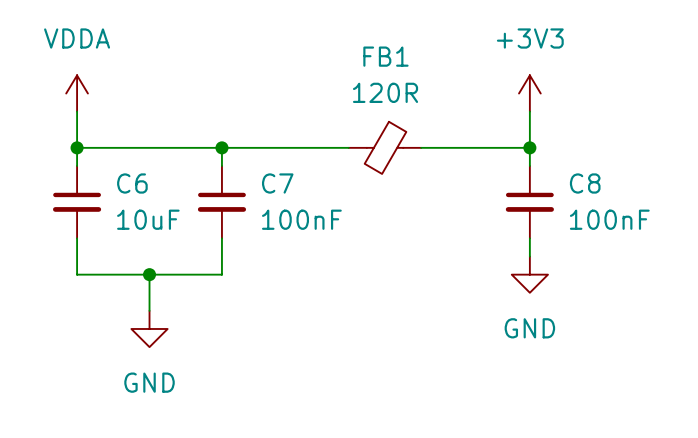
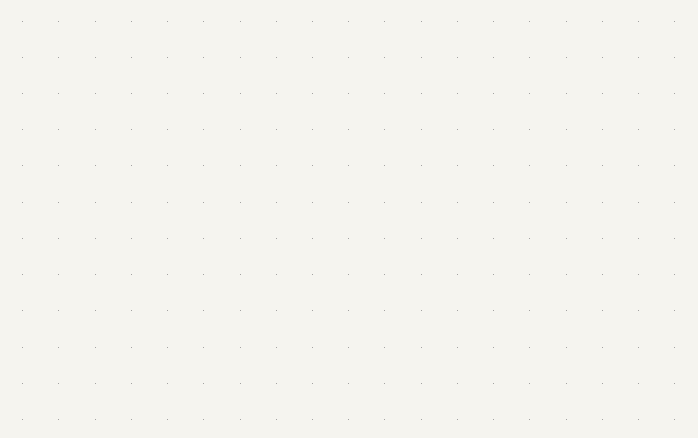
power symbol: VDDA (77, 93) -> none
power symbol: +3V3 (529, 93) -> none
wire: (77, 111) (77, 165) -> none
wire: (529, 111) (529, 165) -> none
wire: (77, 147) (348, 147) -> none
junction: (77, 147) -> none
wire: (221, 147) (221, 165) -> none
junction: (221, 147) -> none
FB1: 120R (384, 147) -> none
wire: (421, 147) (529, 147) -> none
junction: (529, 147) -> none
C6: 10uF (77, 202) -> none
C7: 100nF (221, 202) -> none
C8: 100nF (529, 202) -> none
wire: (77, 238) (77, 274) (221, 274) (221, 238) -> none
wire: (529, 238) (529, 256) -> none
wire: (149, 274) (149, 310) -> none
junction: (149, 274) -> none
power symbol: GND (529, 274) -> none
power symbol: GND (149, 328) -> none

